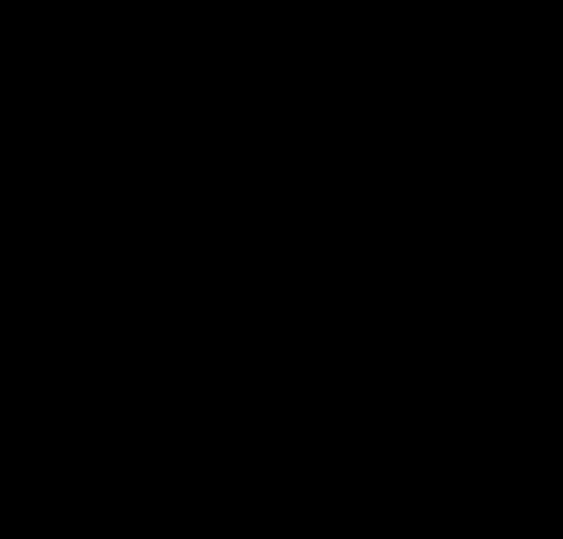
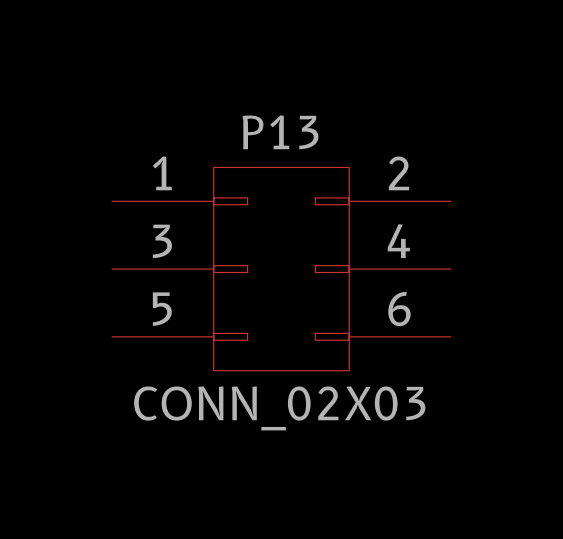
P13: none -> CONN_02X03 (281, 269)

